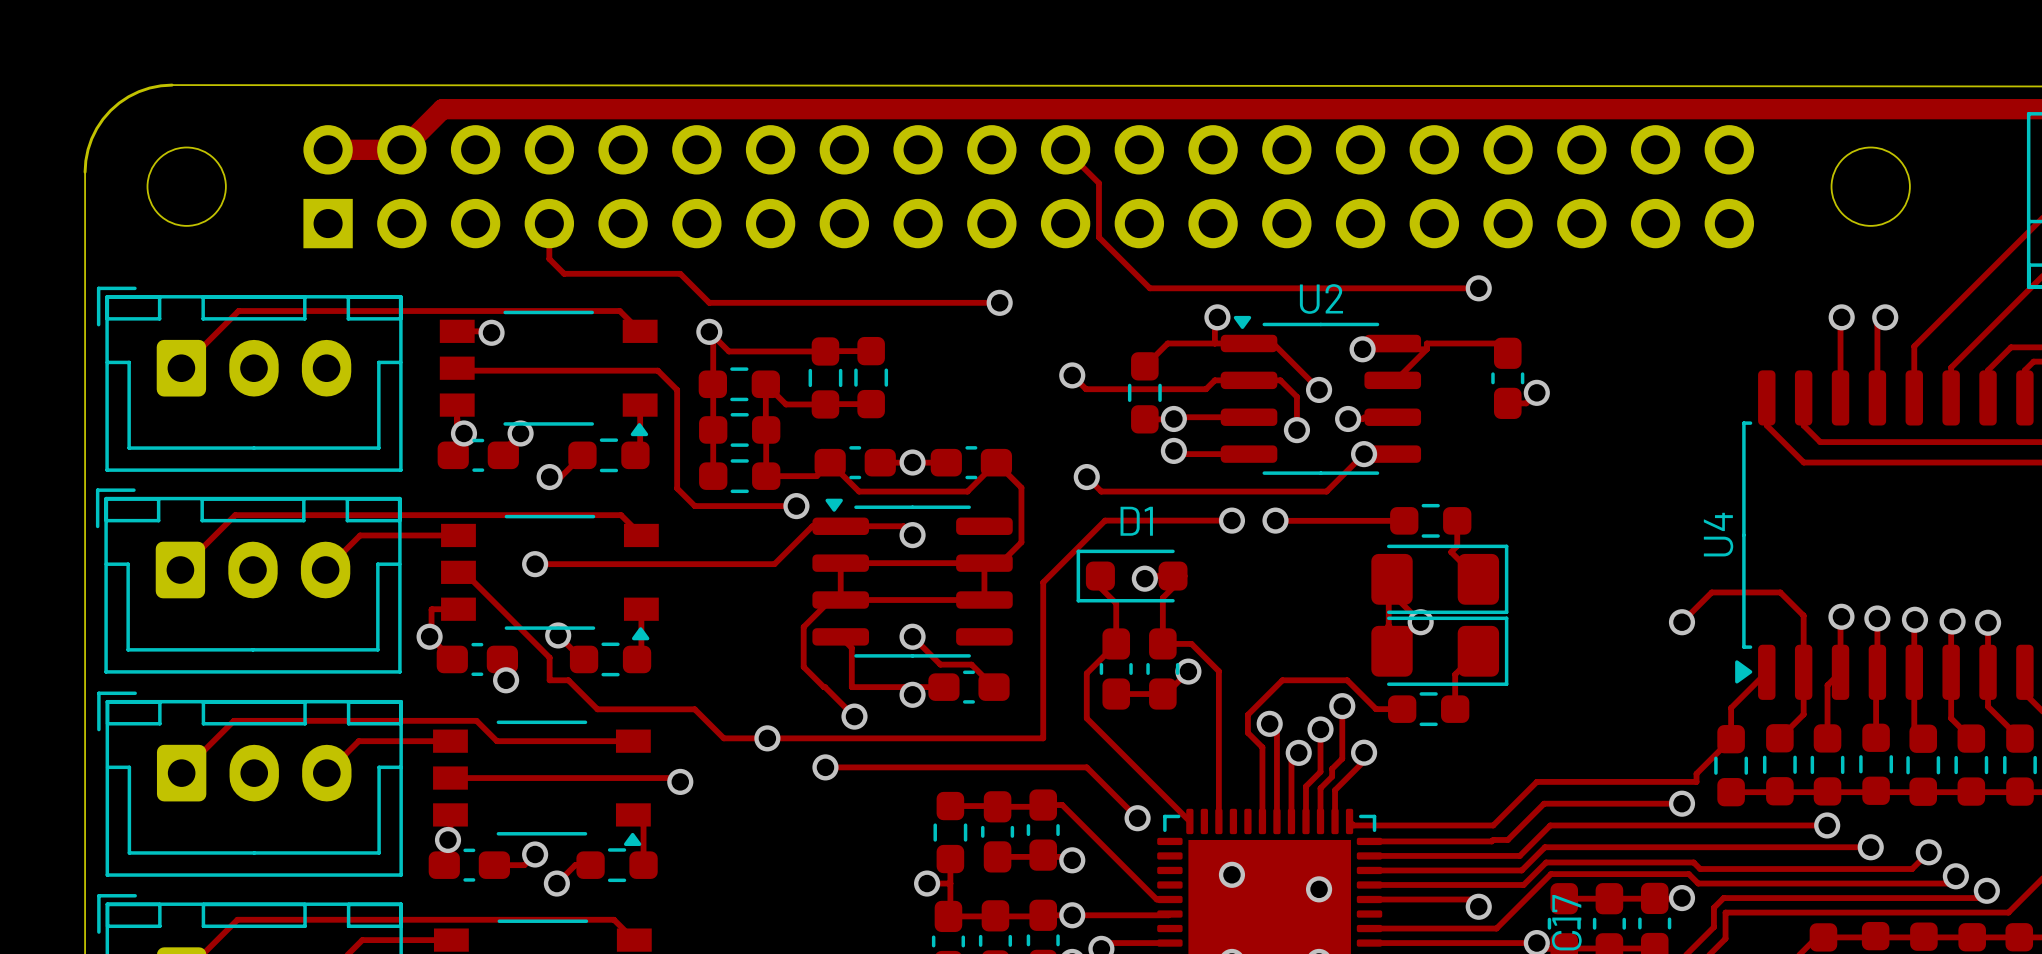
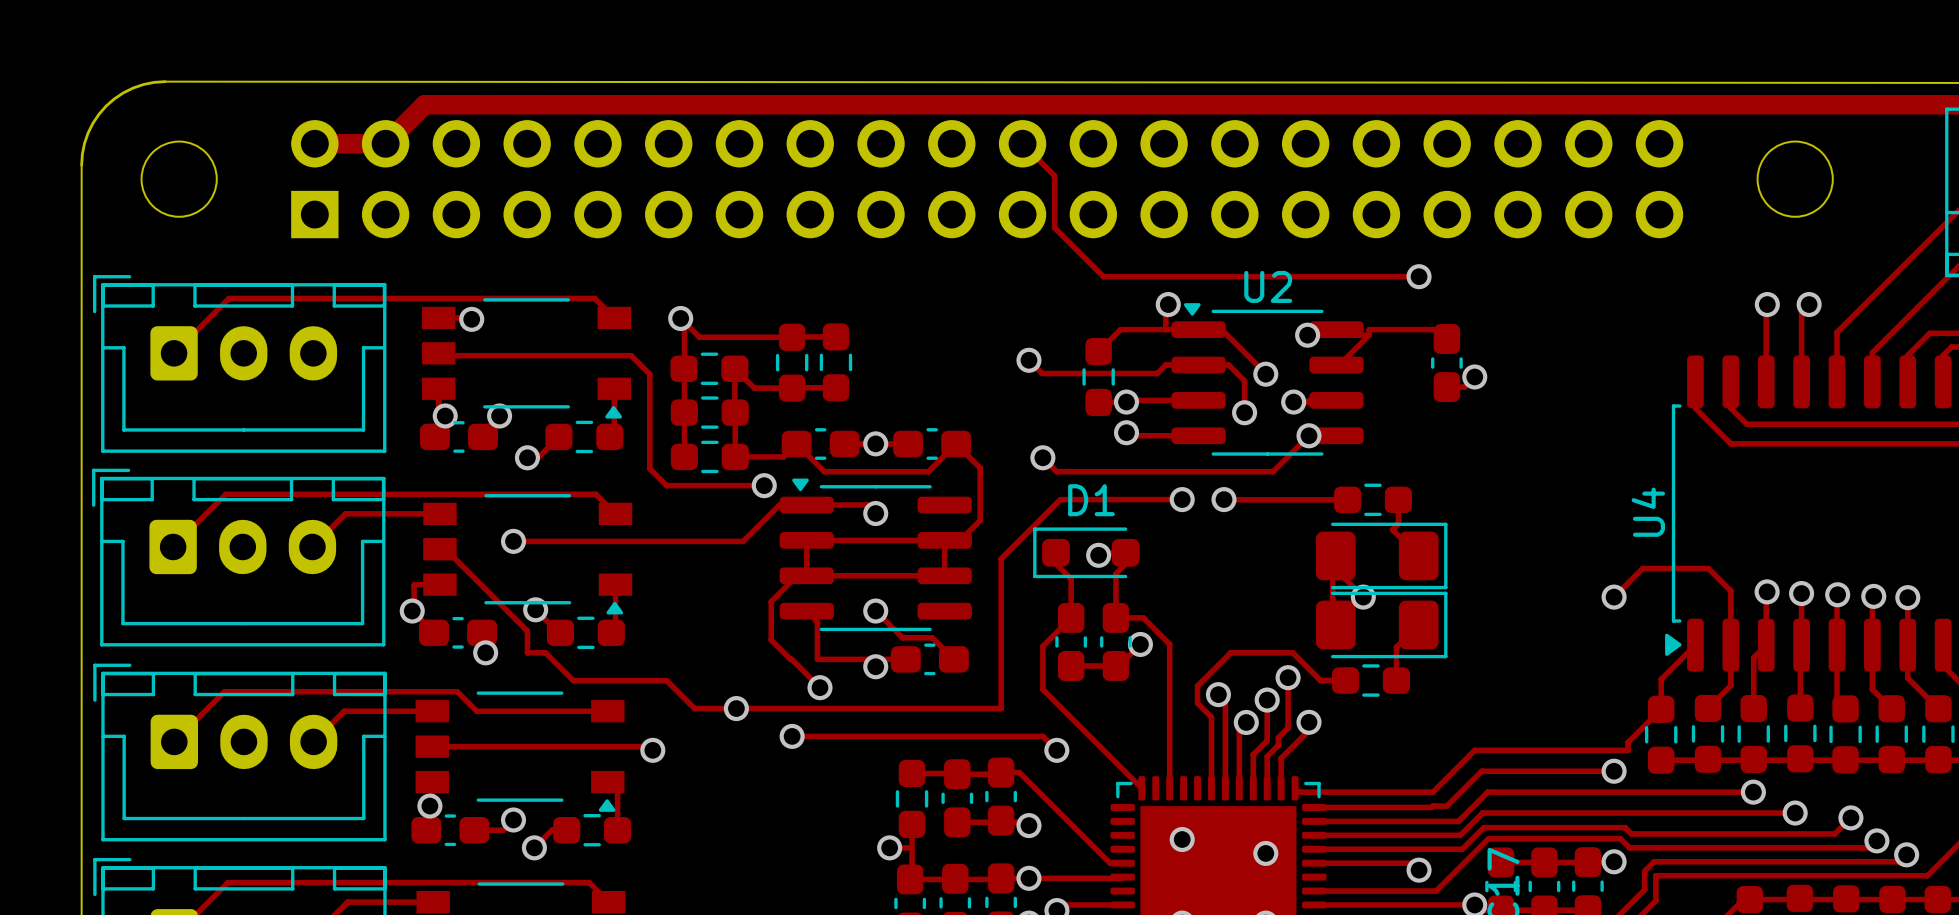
track: (549, 223) (549, 258) (564, 273) (680, 273) (709, 302) (999, 302) -> none
via: (999, 302) -> none
track: (1101, 781) (1137, 818) -> none
via position: (1137, 818) -> (1056, 750)

